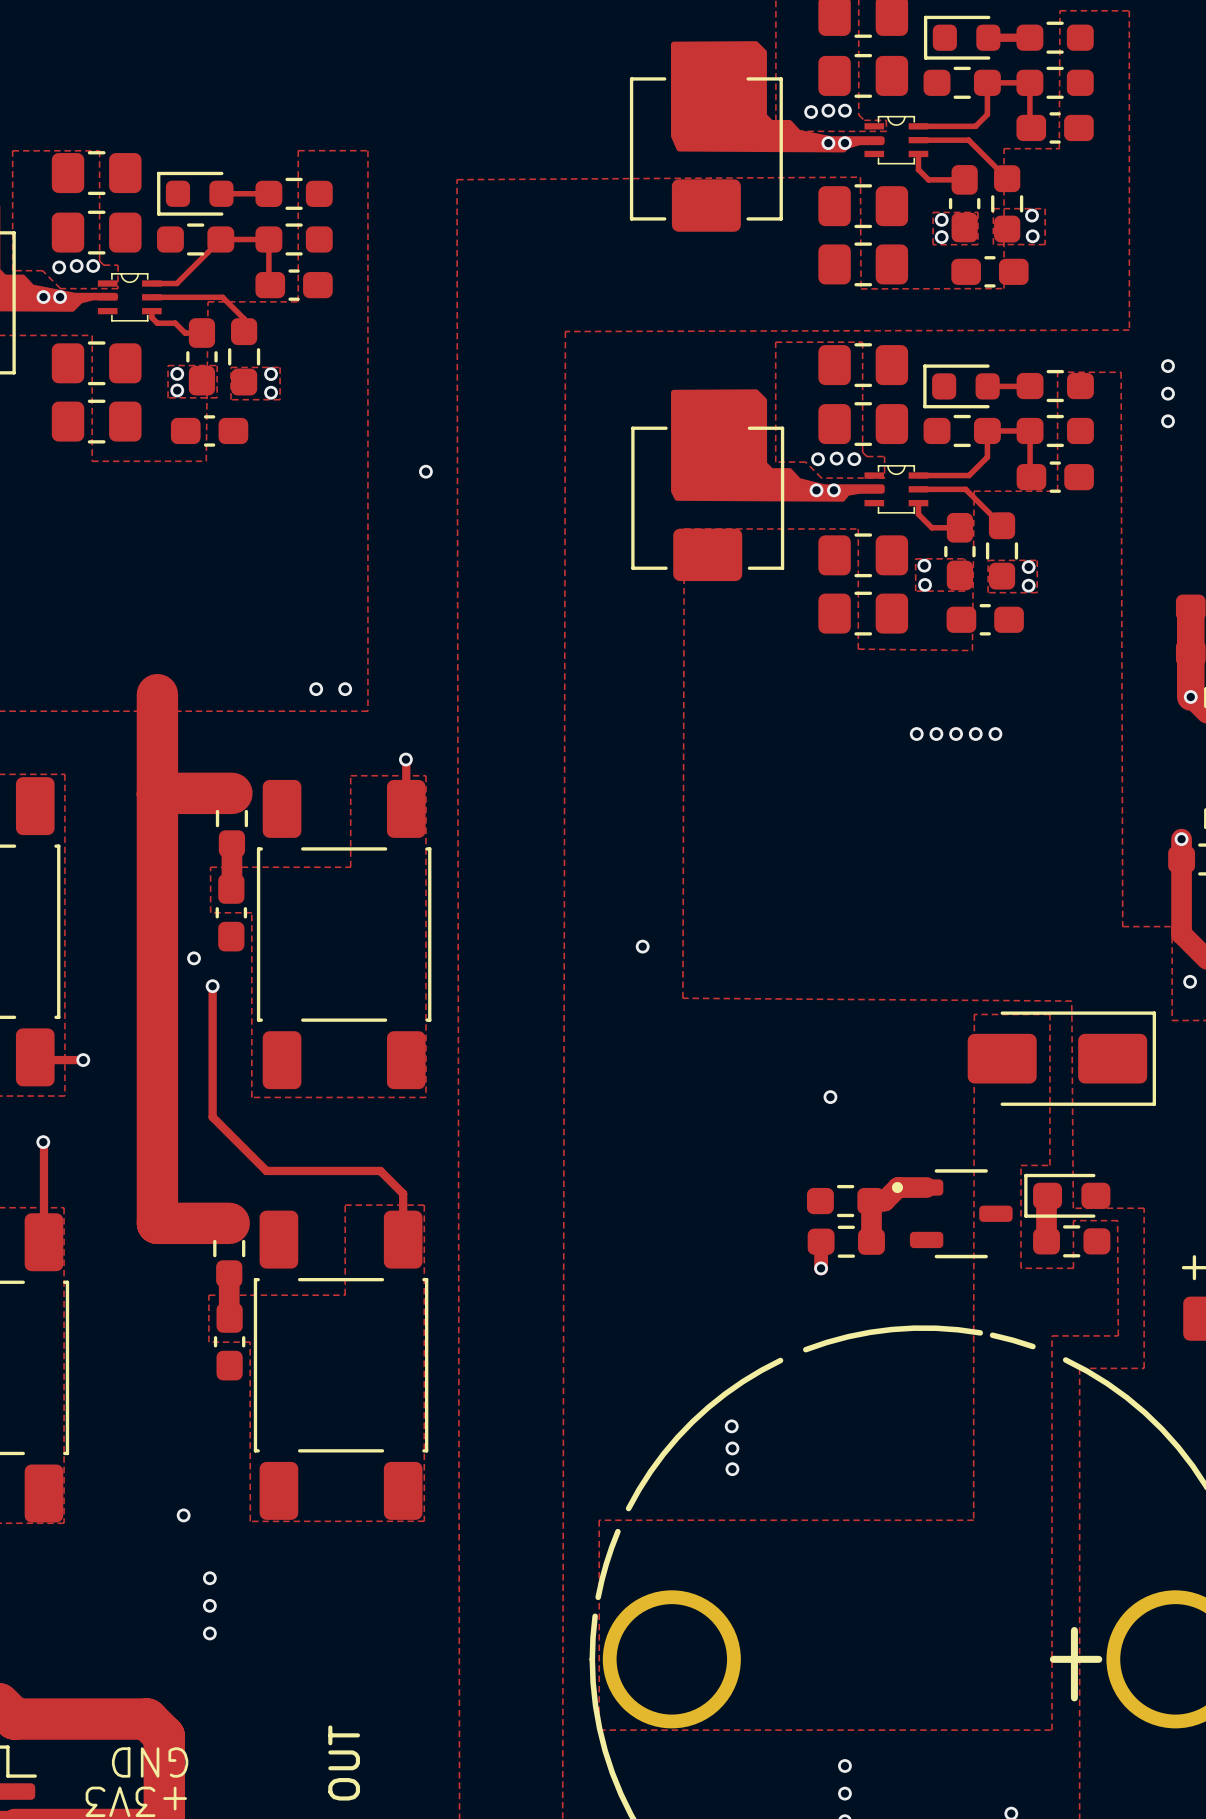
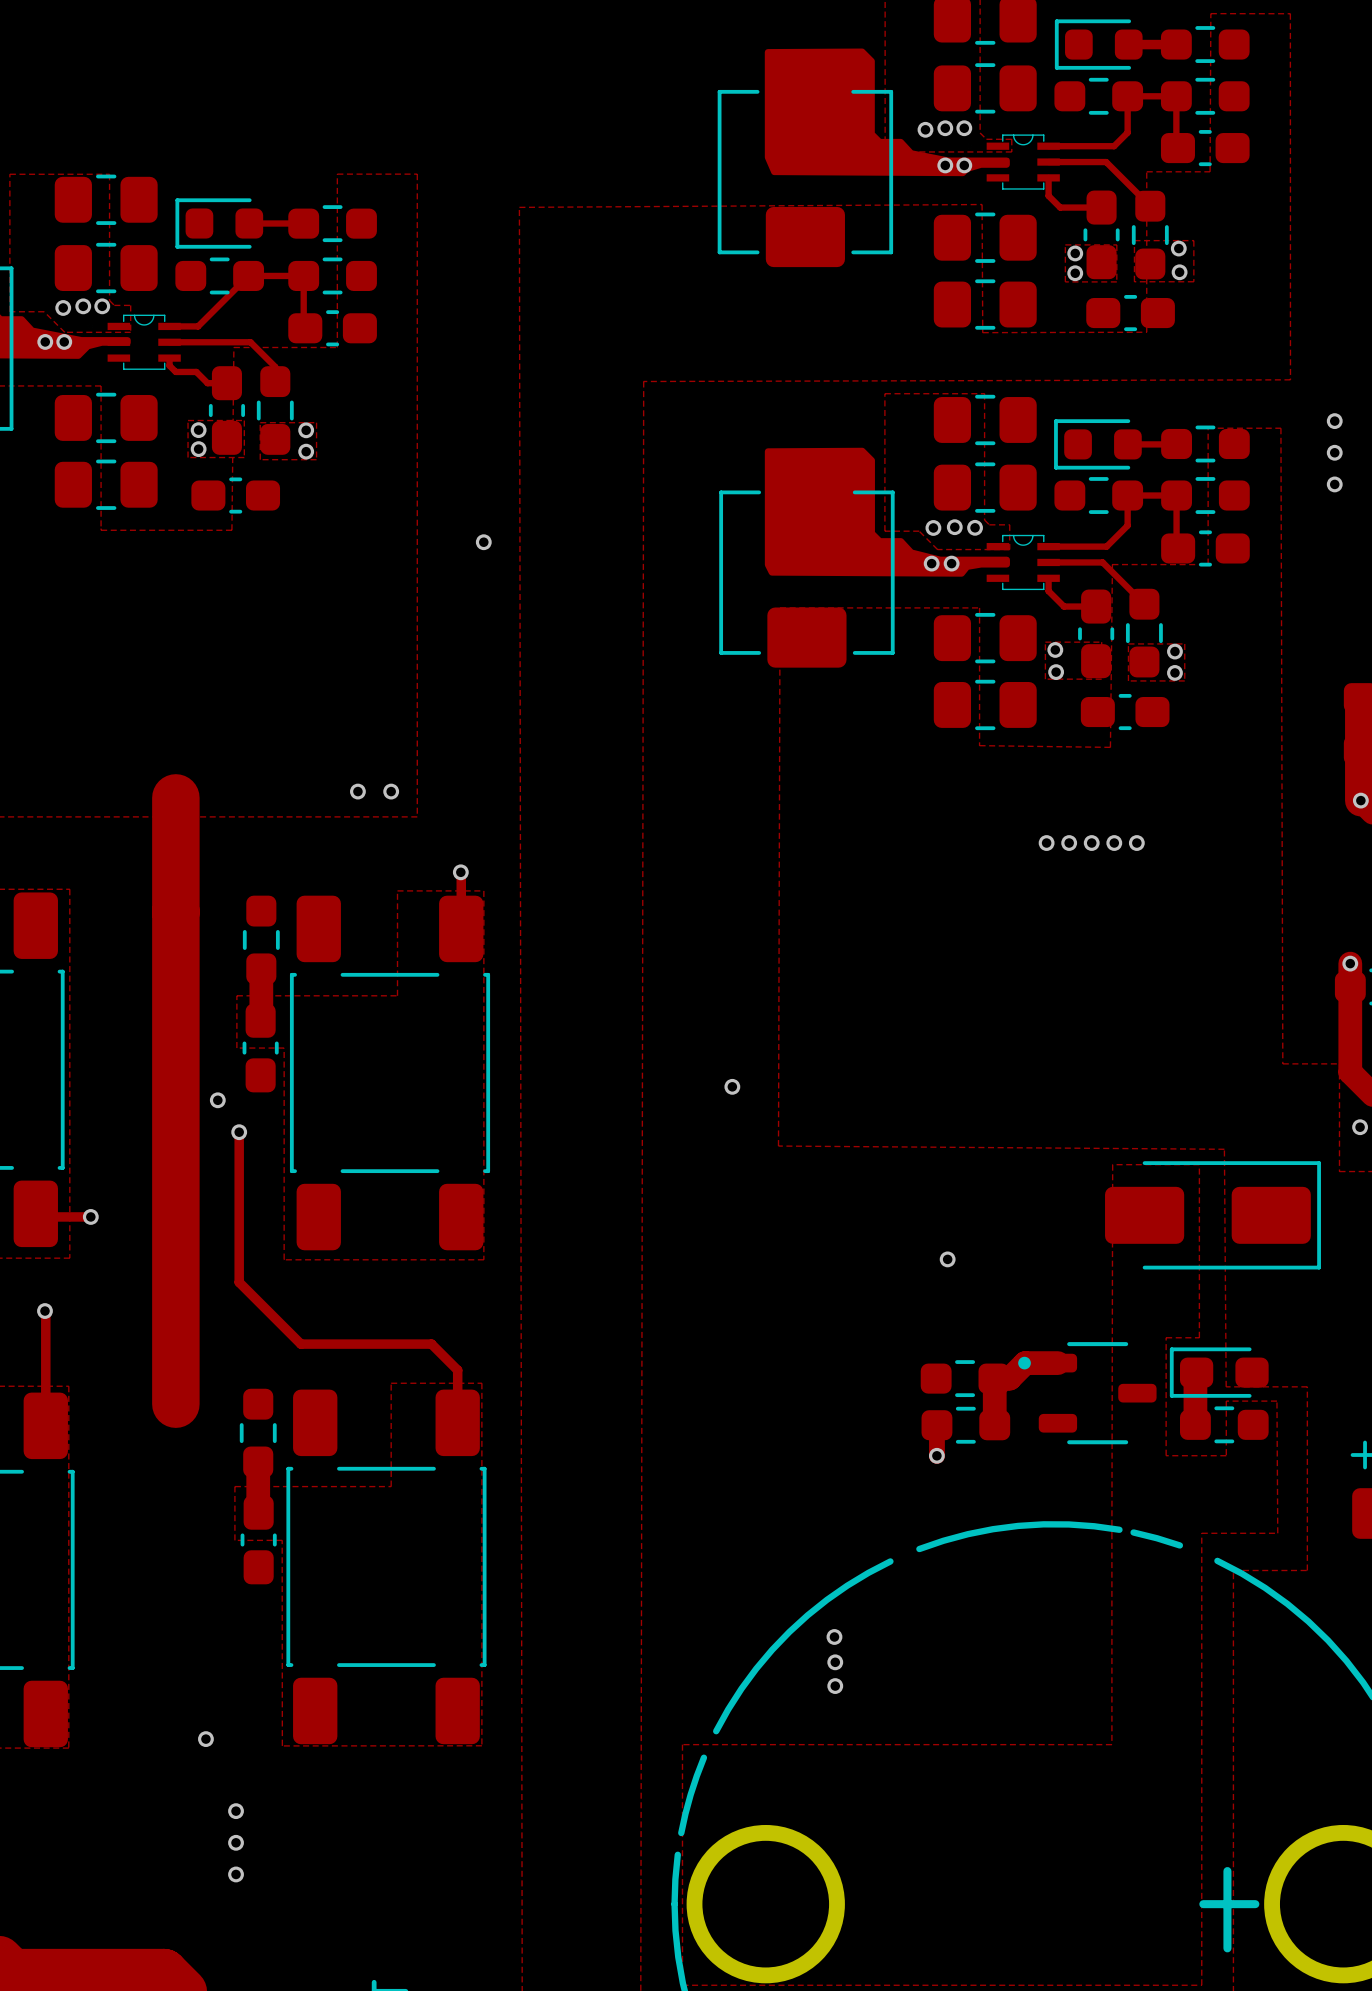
track: (231, 793) (157, 794) -> none
track: (157, 1223) (229, 1223) -> none

